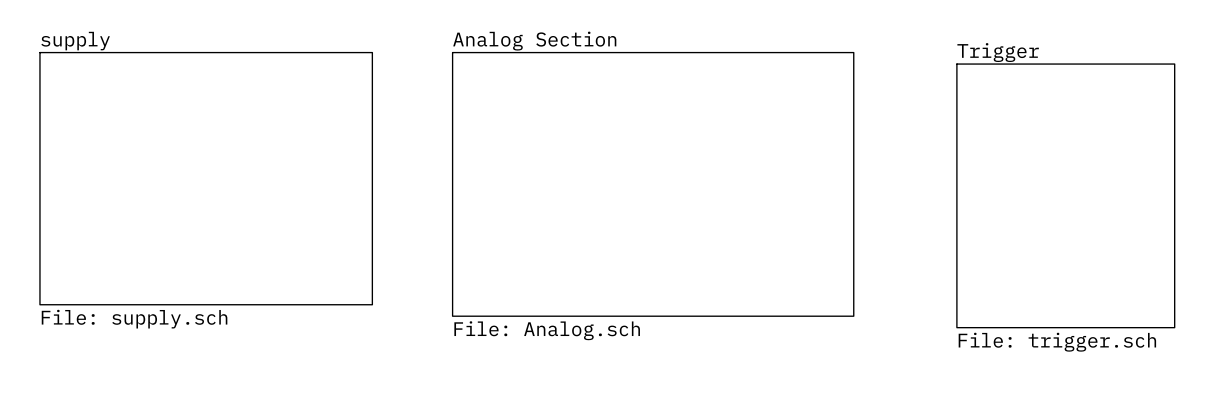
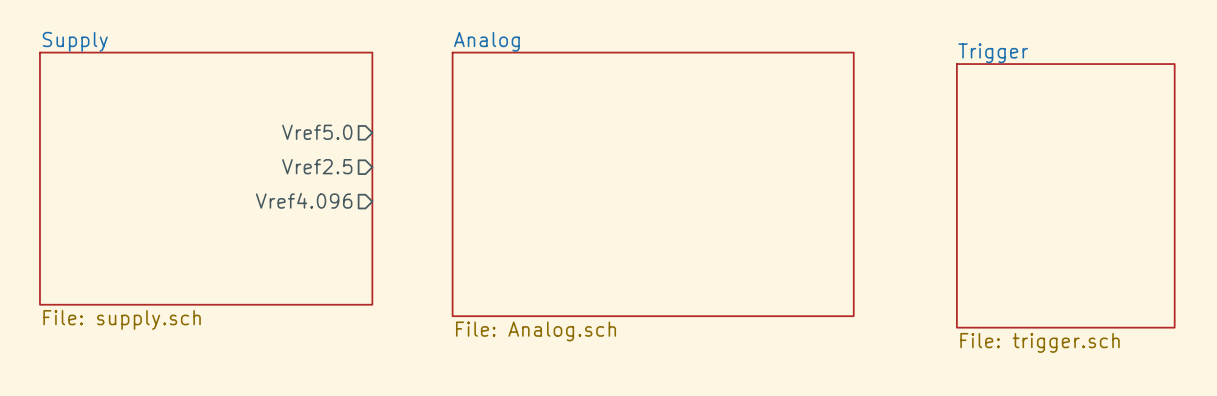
sheet supply name: supply (75, 41) -> Supply (75, 41)
sheet Analog Section name: Analog Section (534, 41) -> Analog (486, 41)
sheet pin: none -> Vref5.0 (317, 132)
sheet pin: none -> Vref2.5 (317, 166)
sheet pin: none -> Vref4.096 (304, 200)

